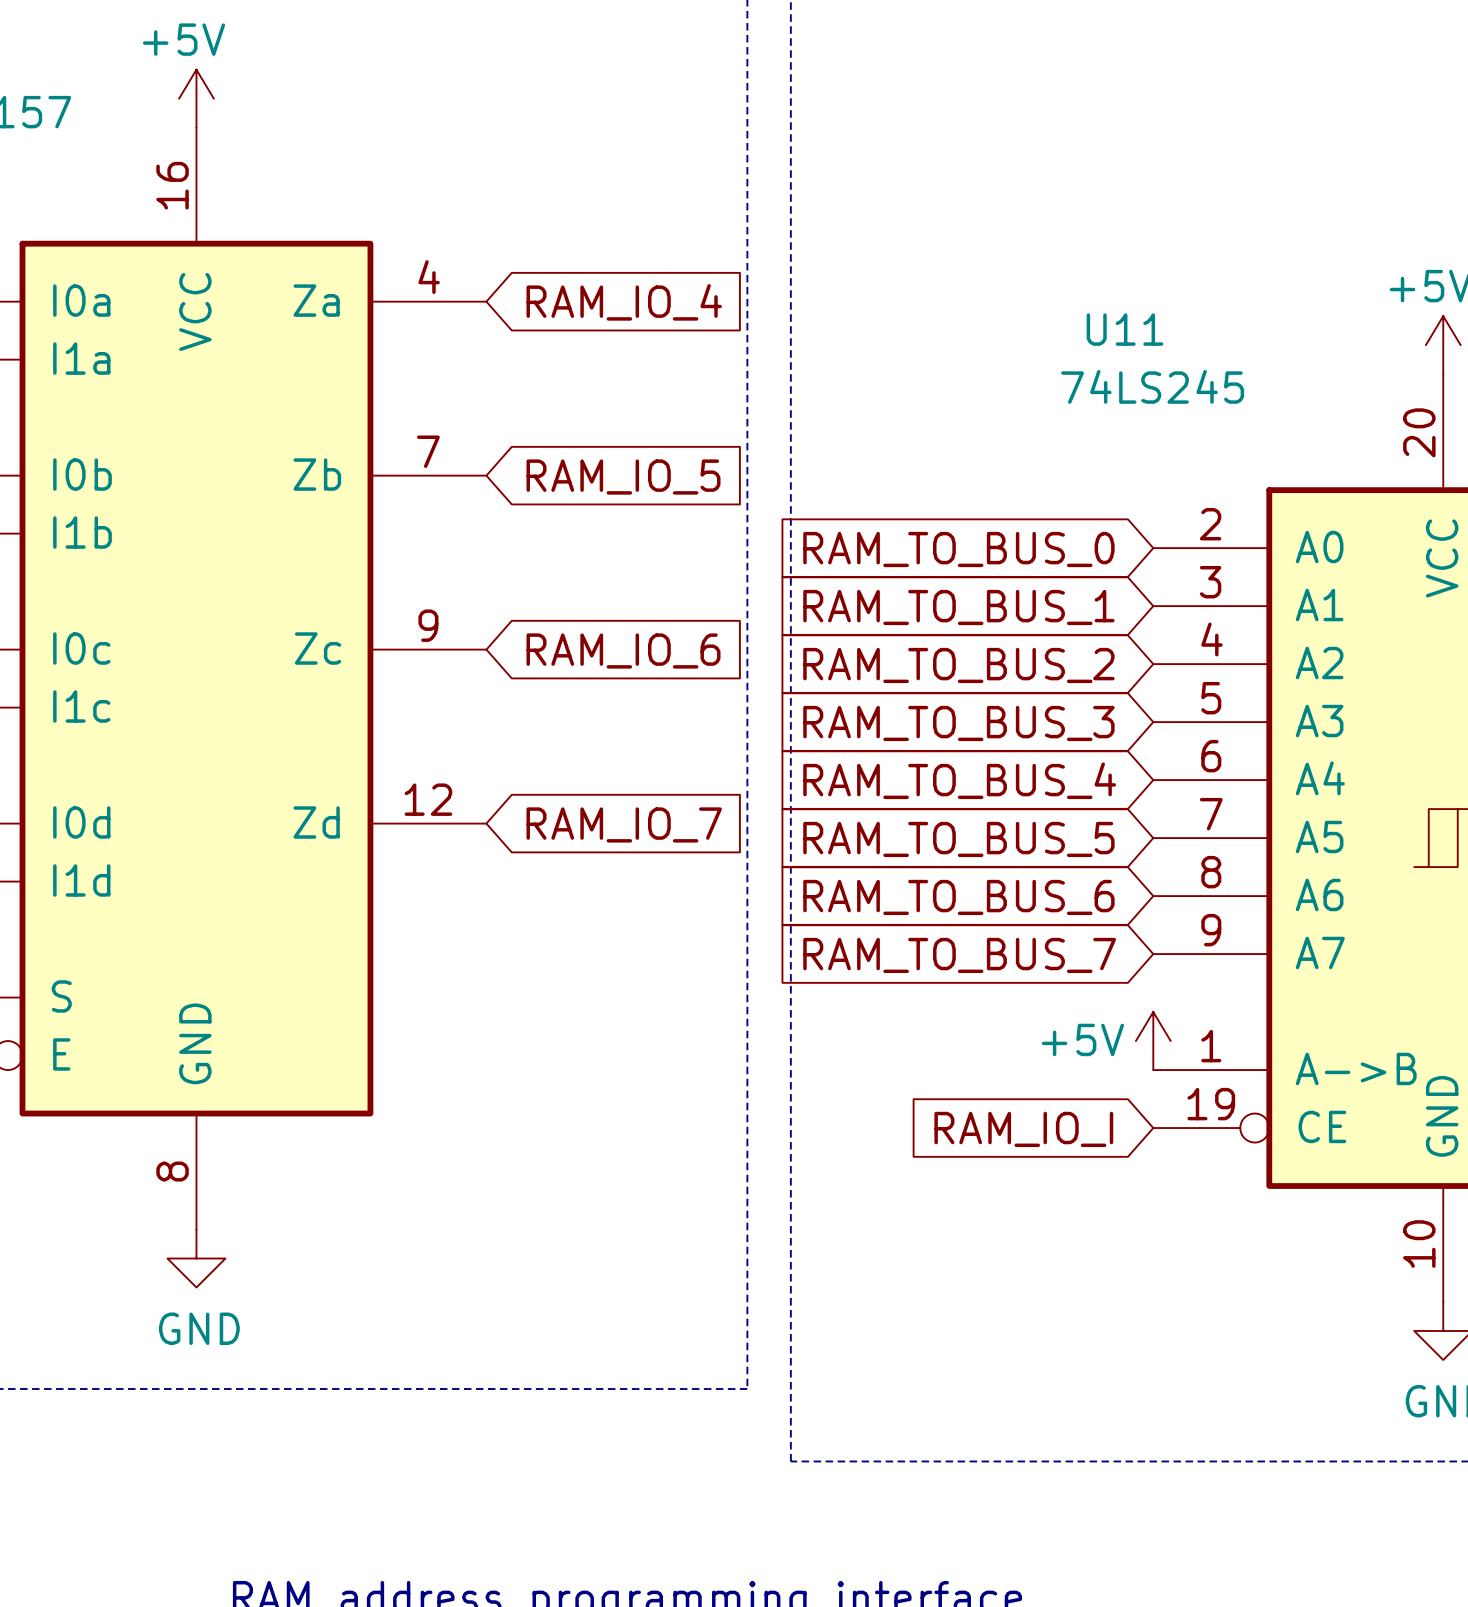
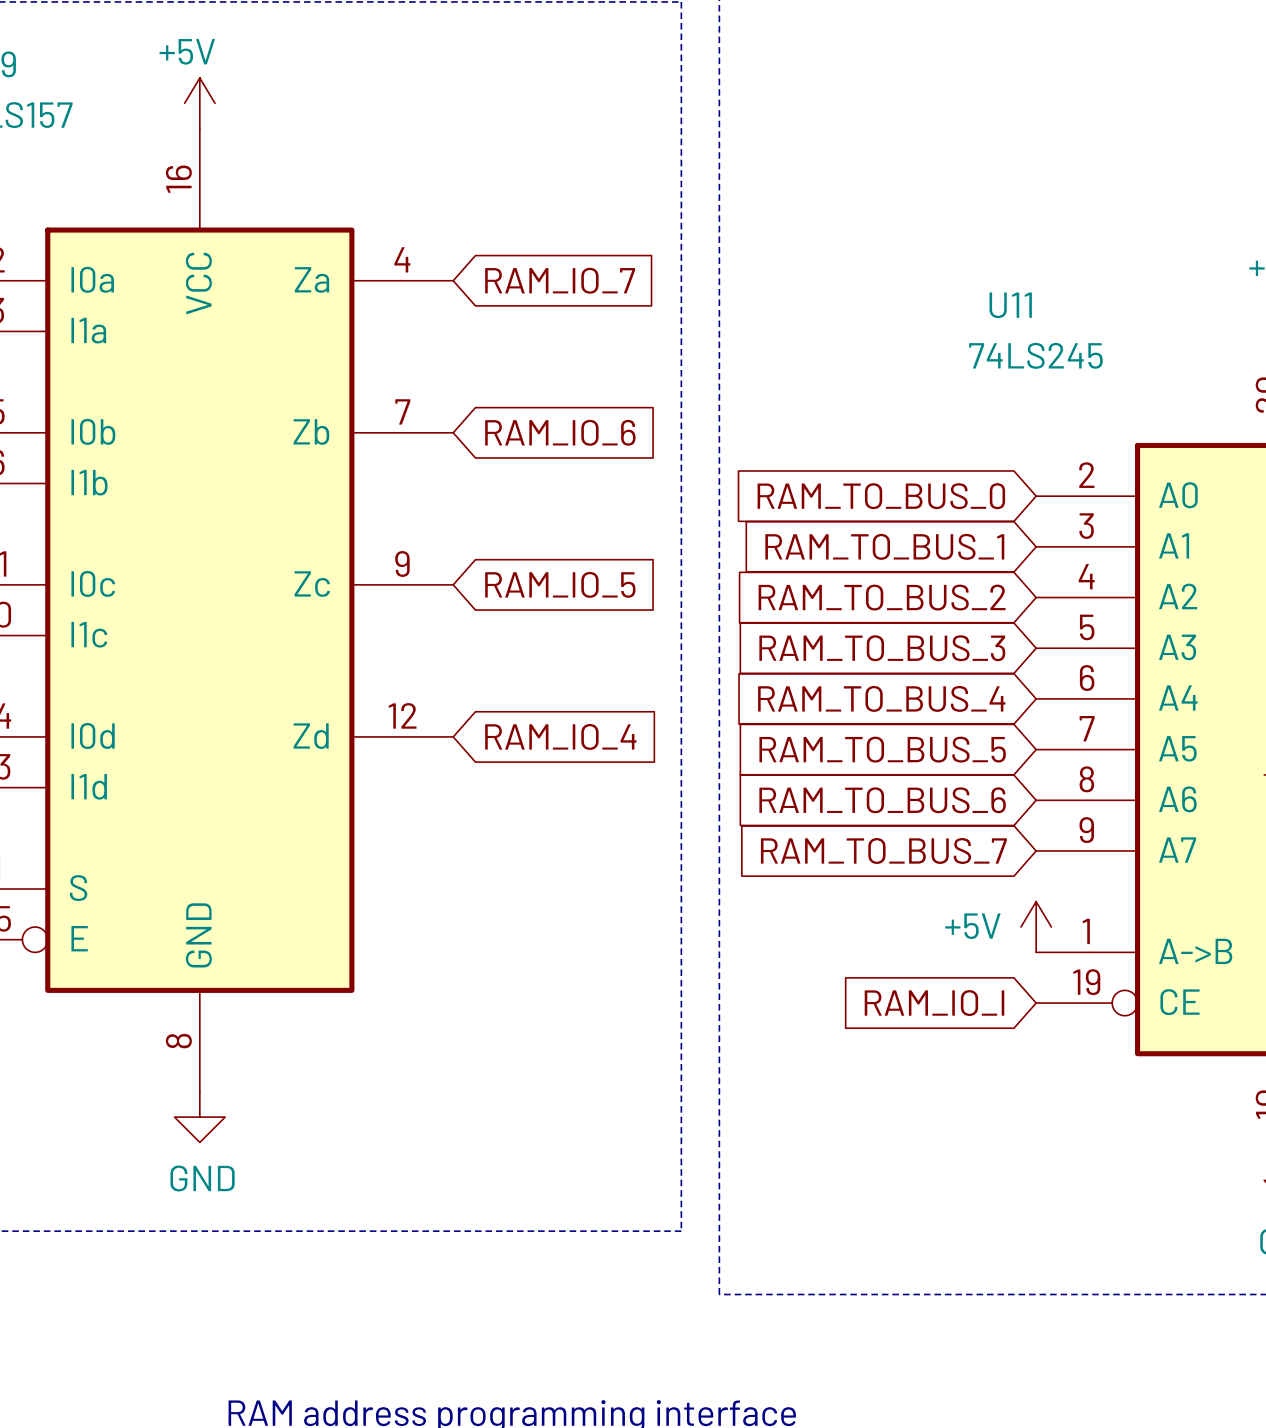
global label: RAM_IO_4 (624, 302) -> RAM_IO_7 (560, 280)
global label: RAM_IO_5 (623, 477) -> RAM_IO_6 (560, 432)
global label: RAM_IO_6 (623, 650) -> RAM_IO_5 (560, 584)
global label: RAM_IO_7 (624, 824) -> RAM_IO_4 (560, 736)

